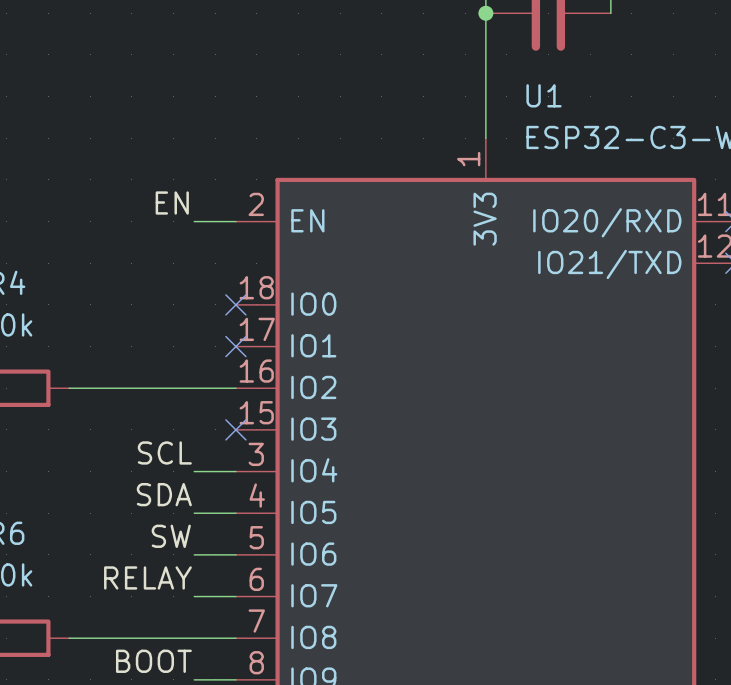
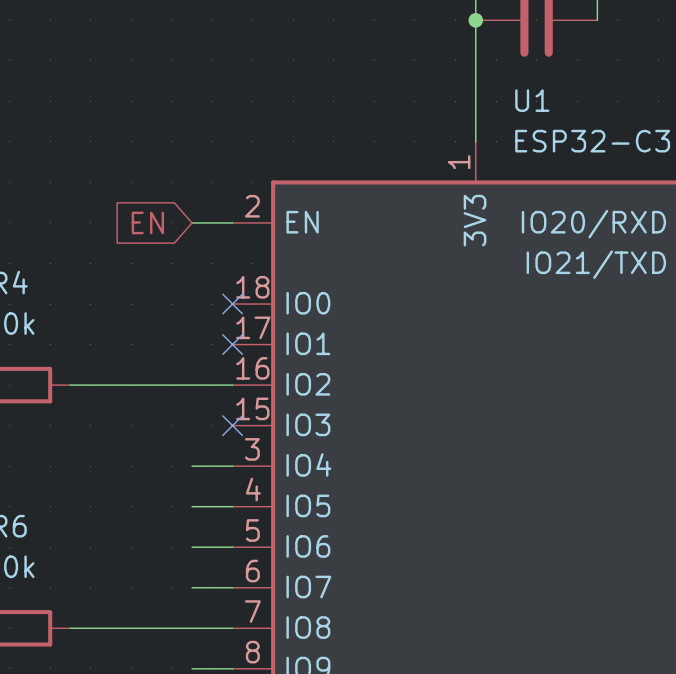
label: EN (172, 203) -> none
global label: none -> EN (147, 222)
label: SCL (164, 452) -> none
label: SDA (164, 494) -> none
label: SW (171, 536) -> none
label: RELAY (147, 577) -> none
label: BOOT (153, 661) -> none

